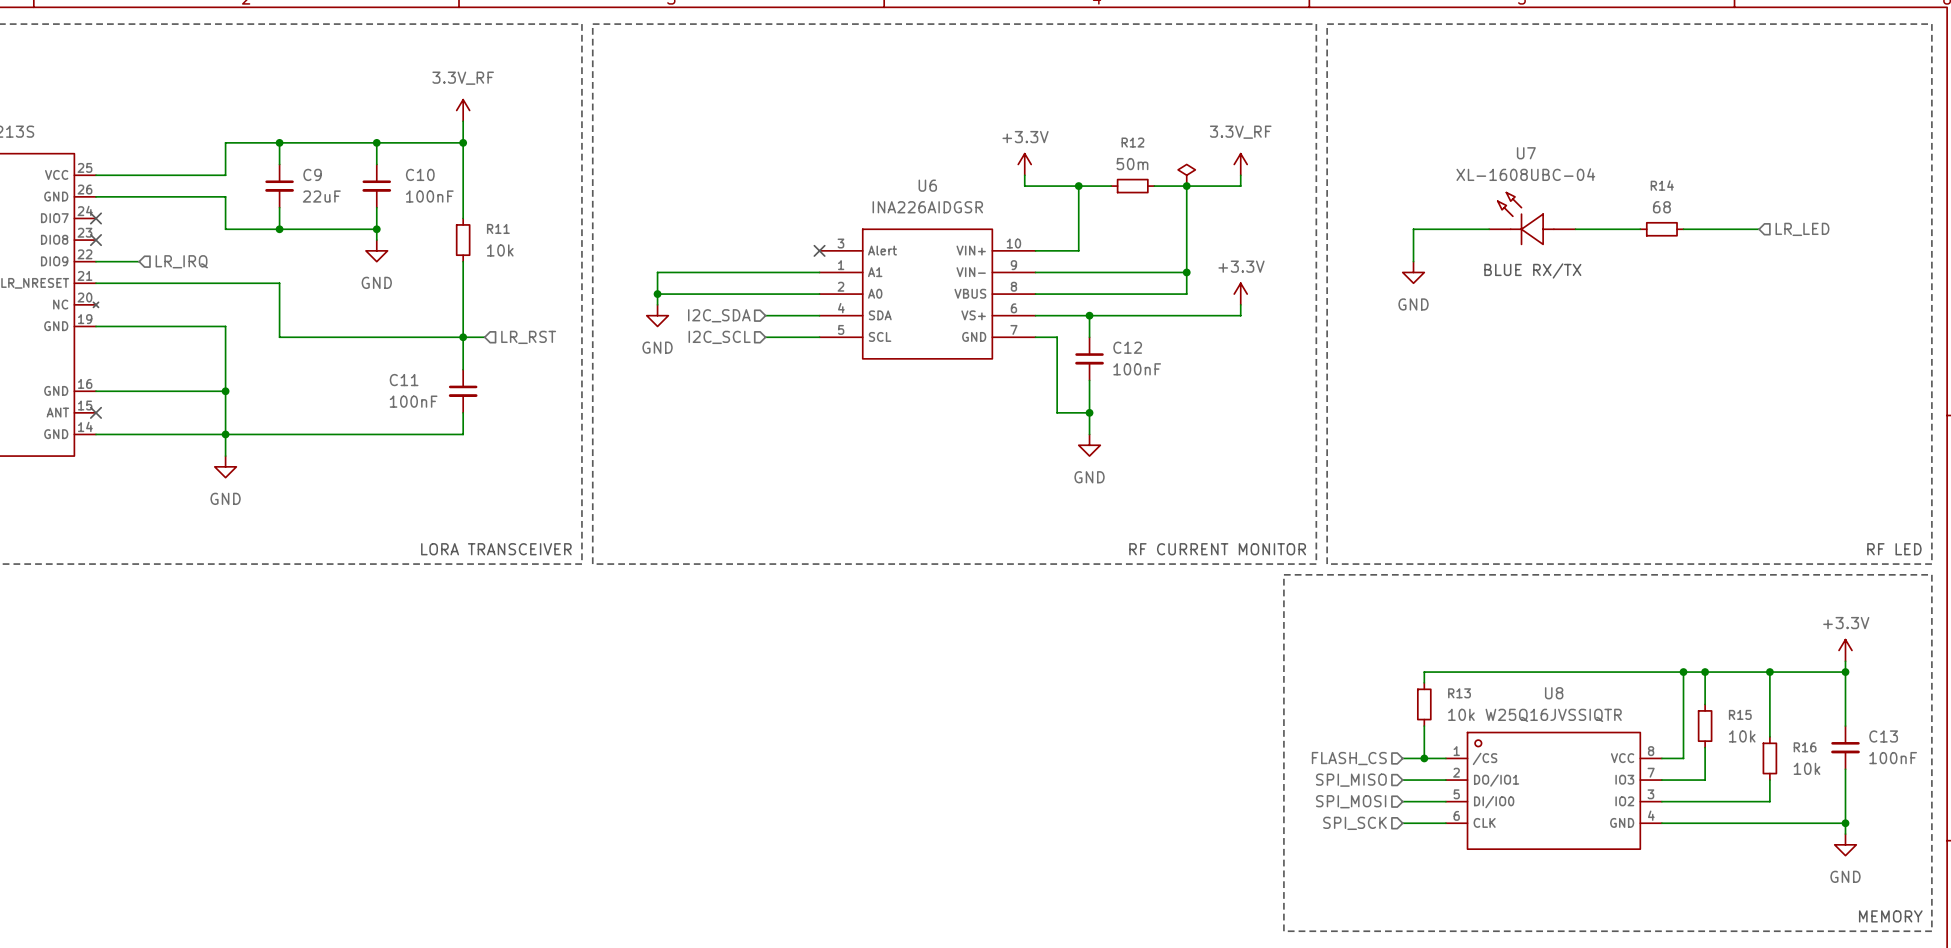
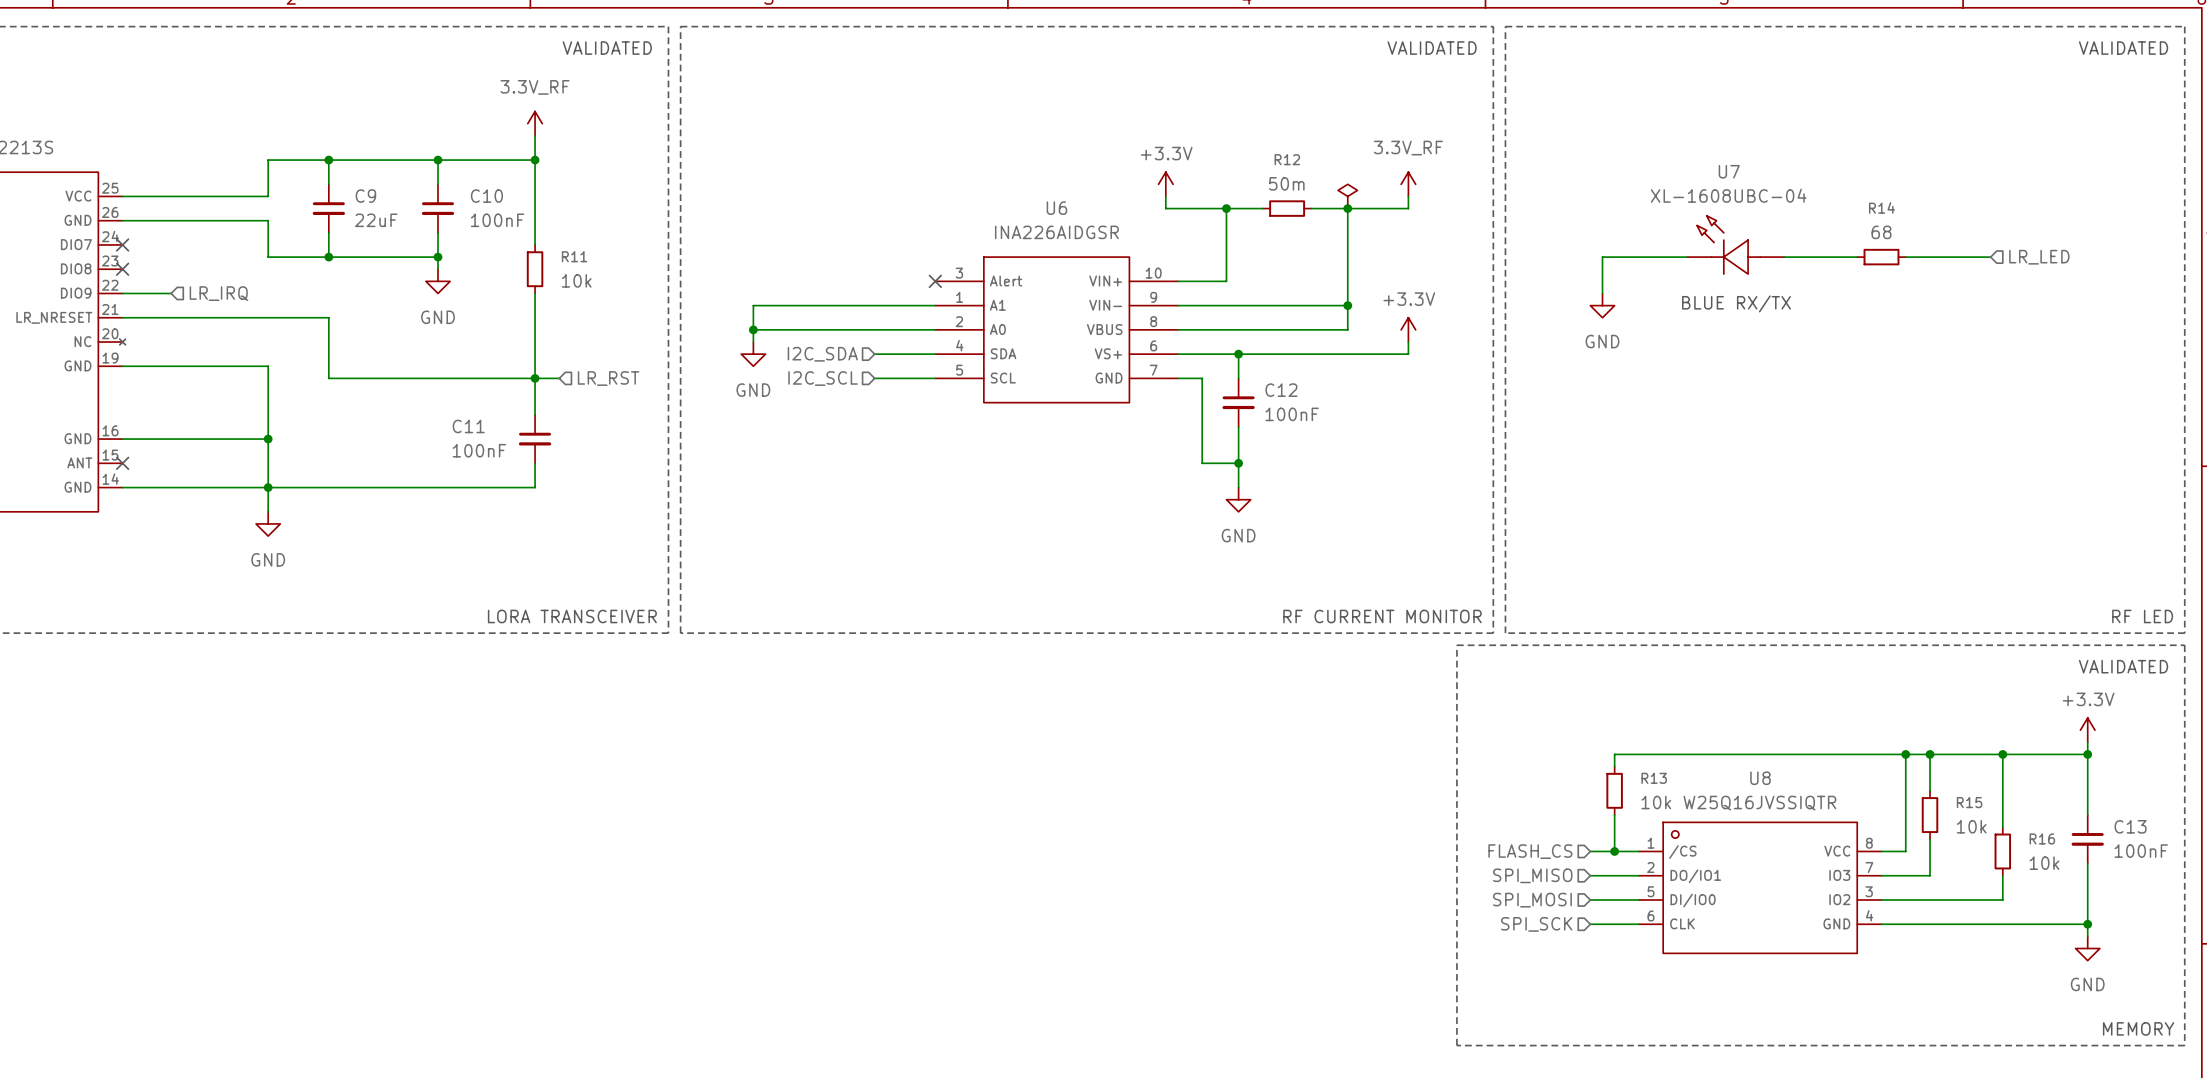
text: none -> VALIDATED (607, 48)
text: none -> VALIDATED (1432, 48)
text: none -> VALIDATED (2123, 48)
text: none -> VALIDATED (2123, 666)

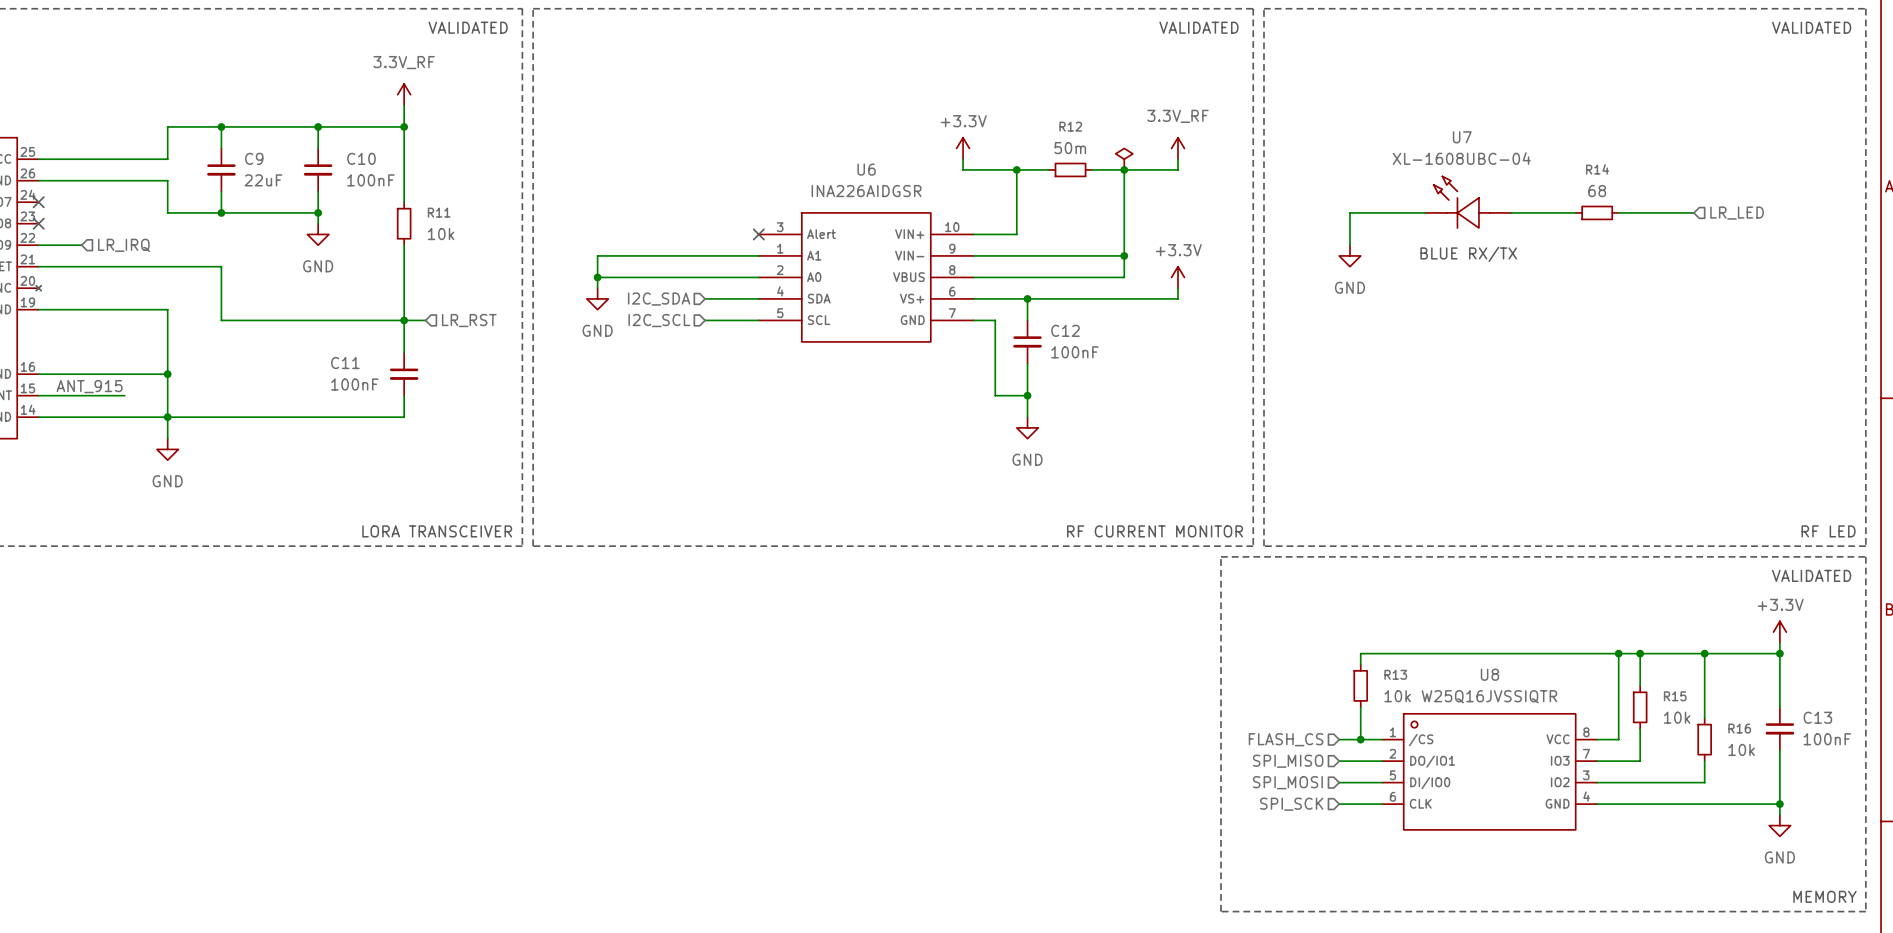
label: none -> ANT_915 (89, 386)
wire: none -> (38, 395) (124, 395)
no-connect mark: (122, 463) -> none

